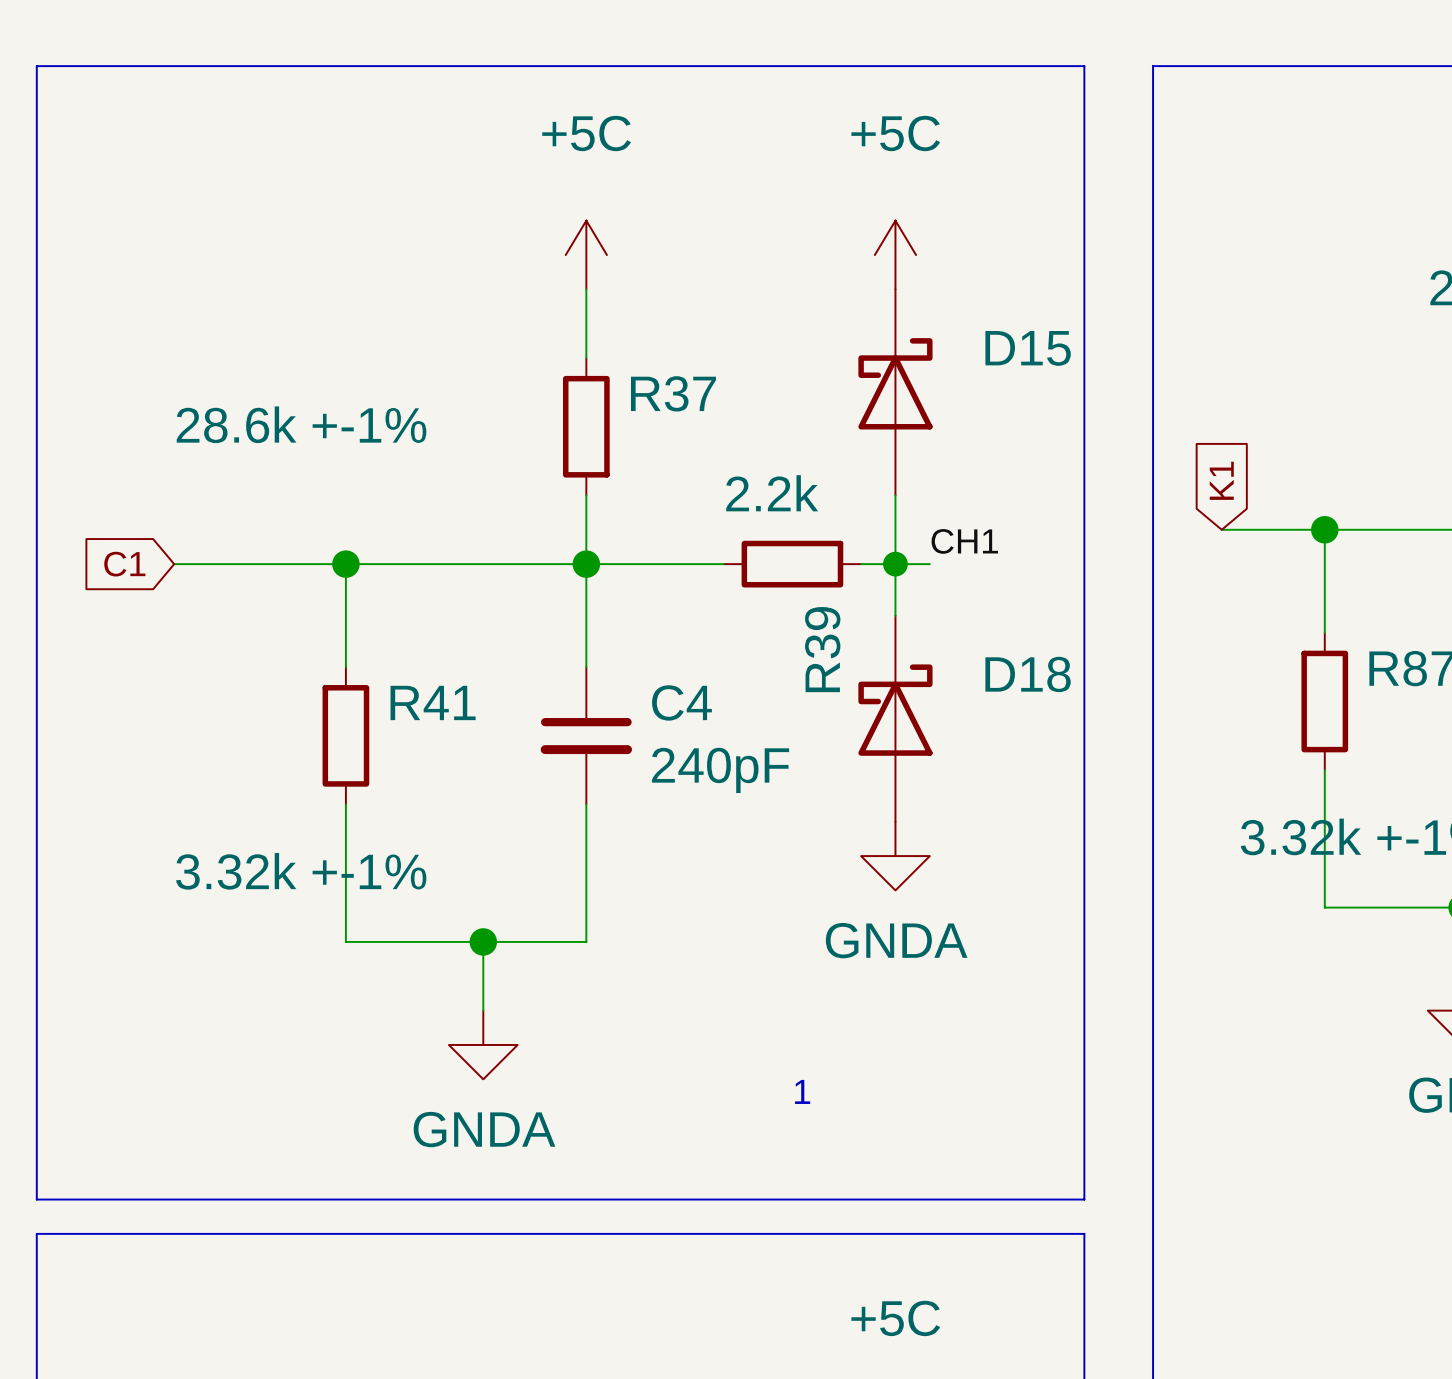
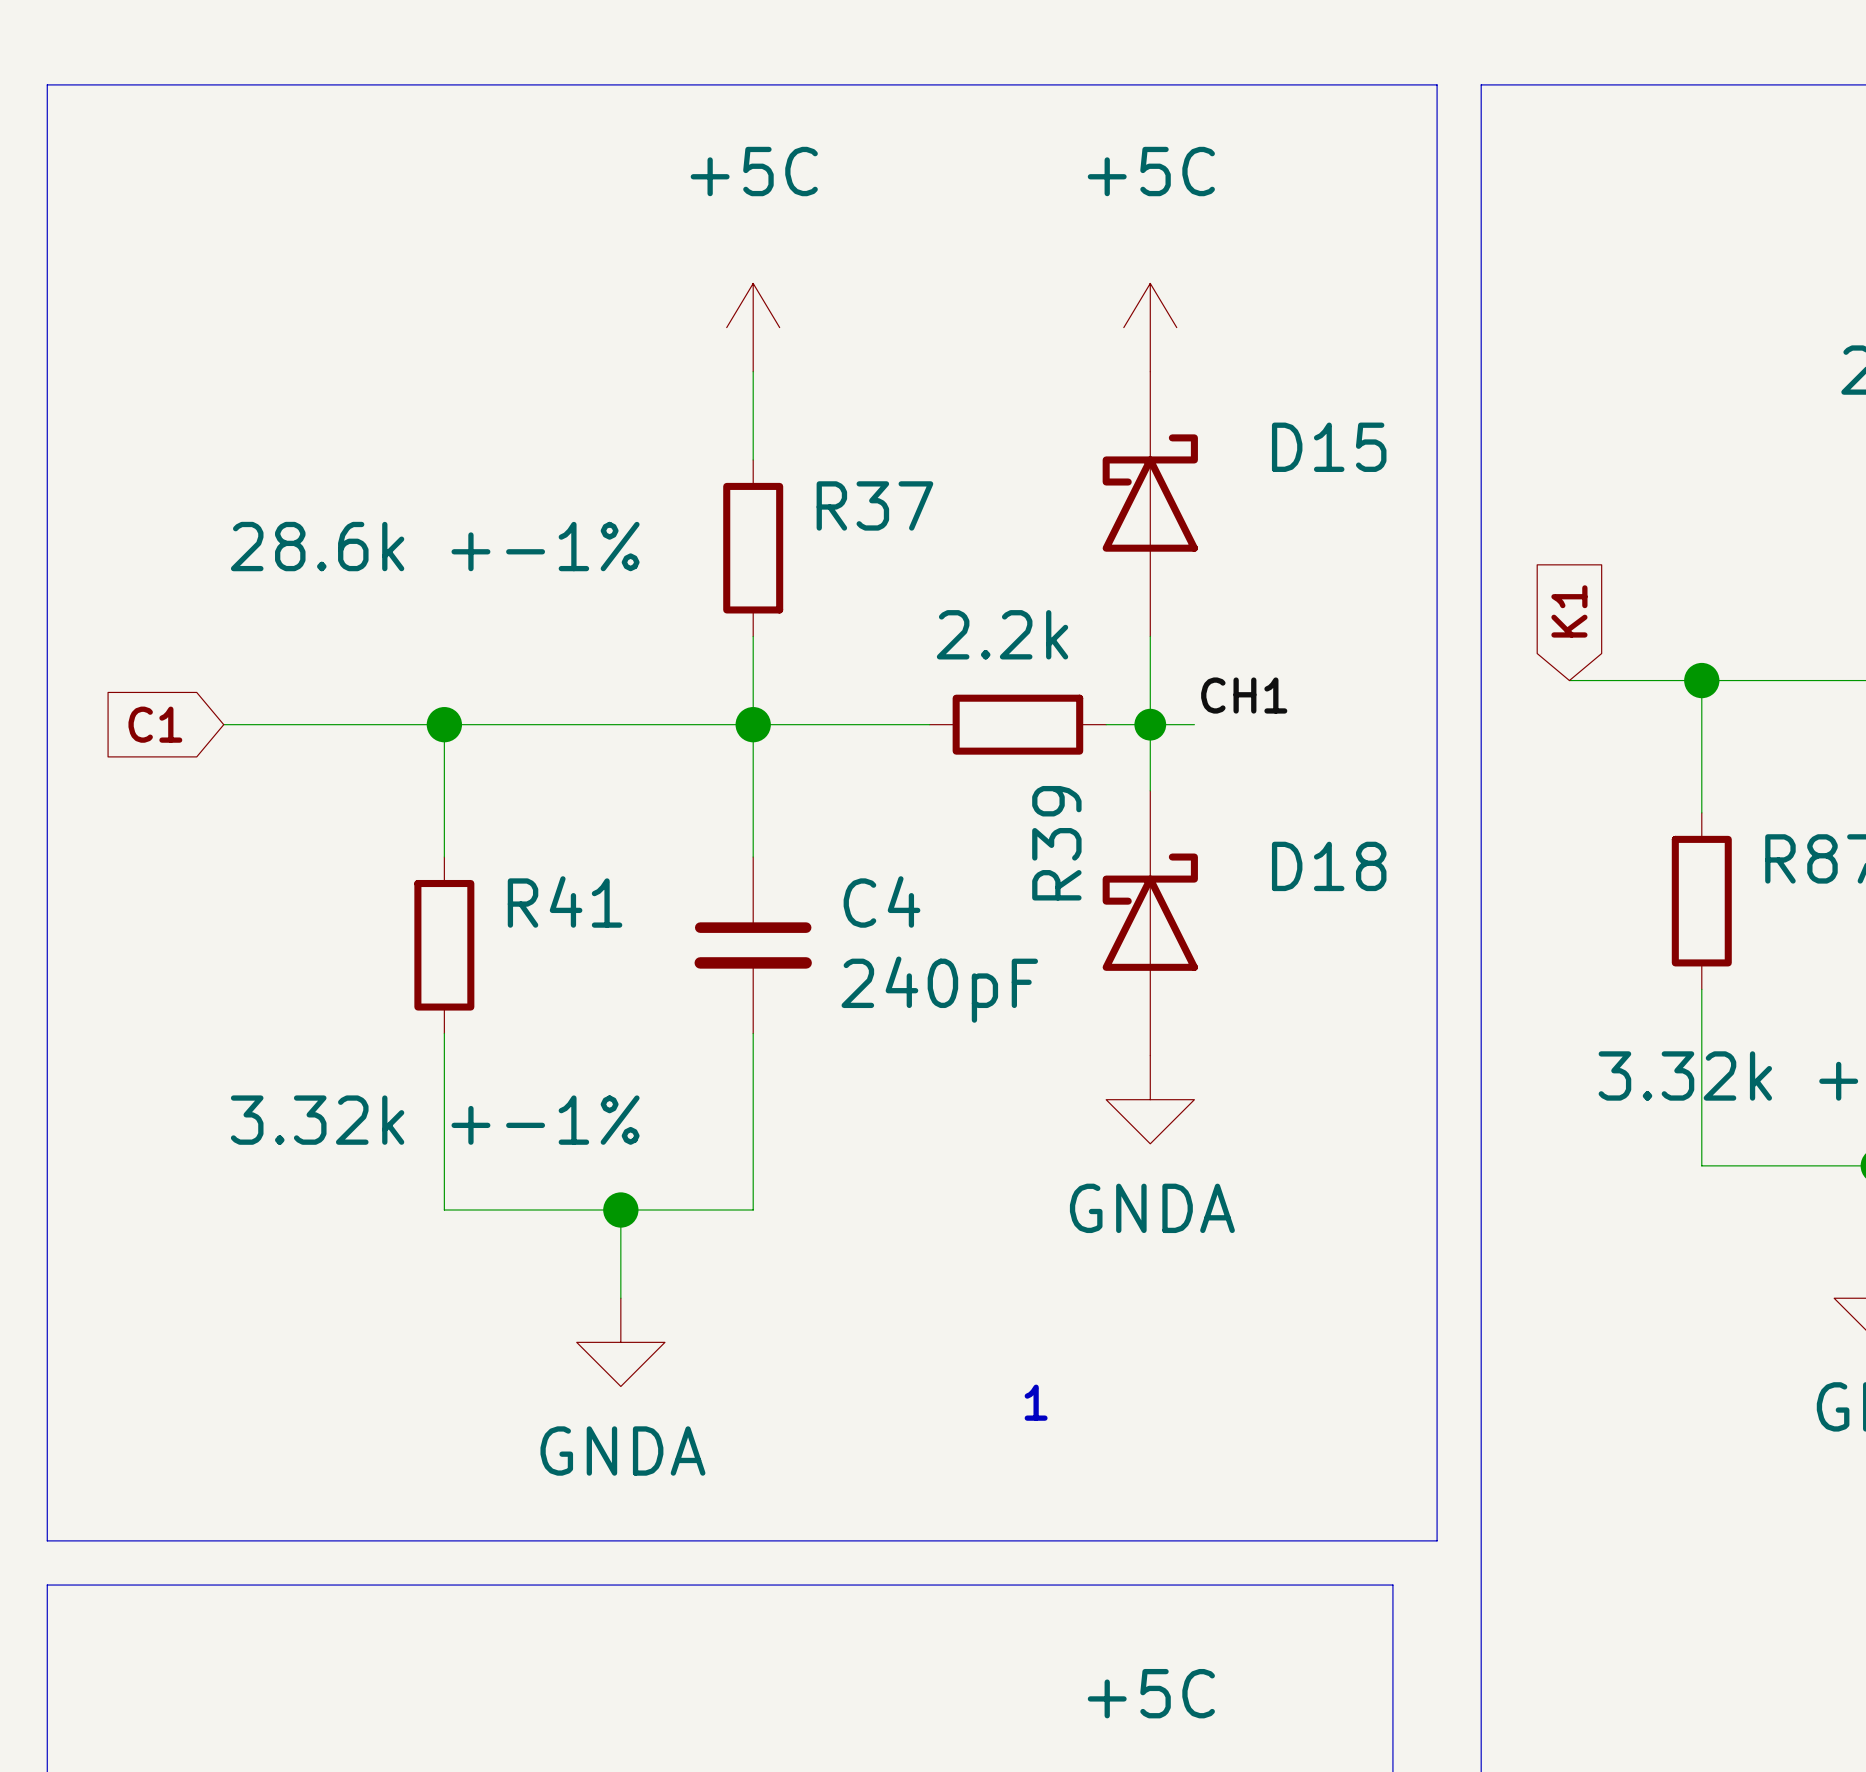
line: (1084, 66) (1084, 1199) -> (1392, 84) (1437, 84) (1437, 1540) (1392, 1540)

